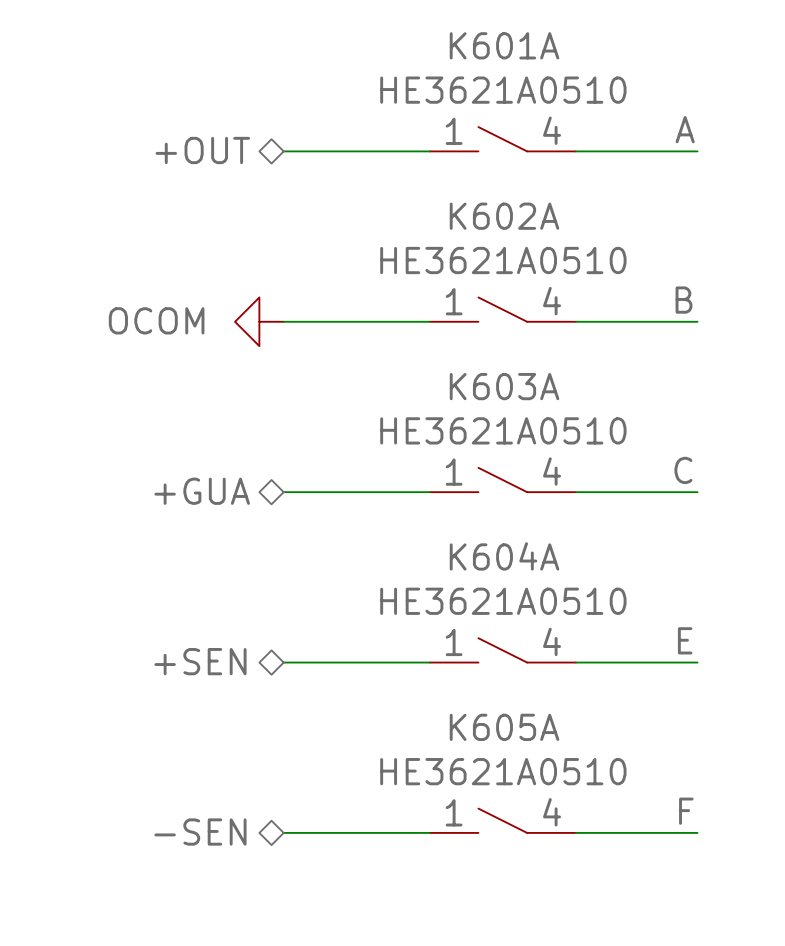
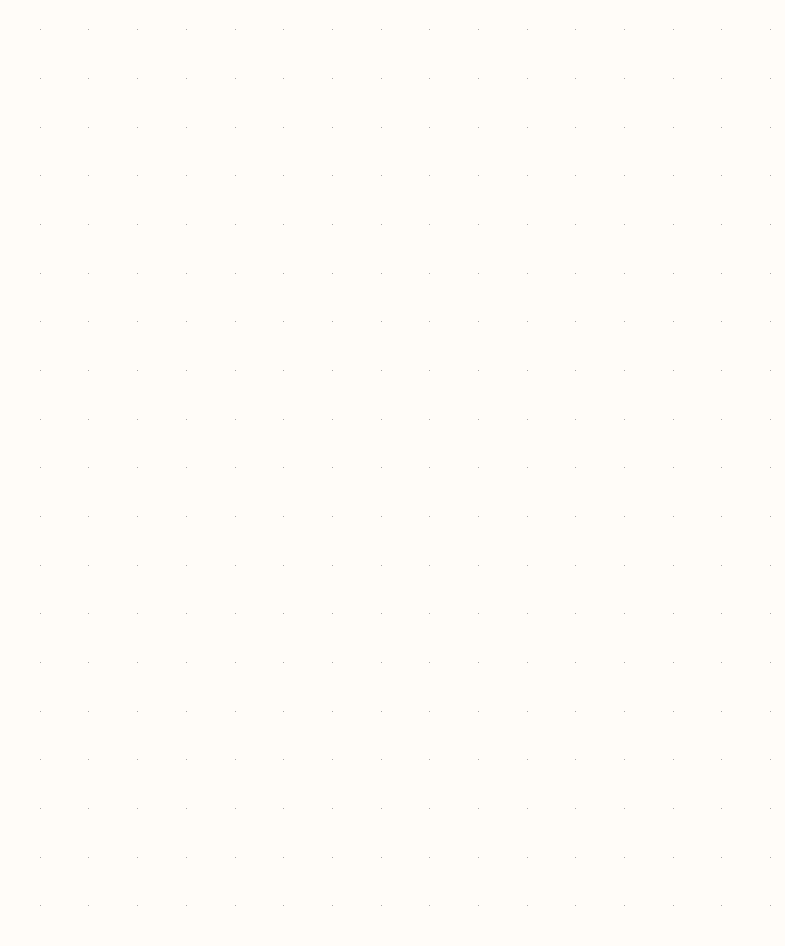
label: A (685, 129) -> none
K601A: HE3621A0510 (502, 139) -> none
hierarchical label: +OUT (202, 150) -> none
wire: (283, 151) (429, 151) -> none
wire: (575, 151) (697, 151) -> none
label: B (684, 300) -> none
K602A: HE3621A0510 (502, 309) -> none
power symbol: OCOM (259, 321) -> none
wire: (283, 321) (429, 321) -> none
wire: (575, 321) (697, 321) -> none
label: C (683, 470) -> none
K603A: HE3621A0510 (502, 479) -> none
hierarchical label: +GUA (202, 491) -> none
wire: (283, 492) (429, 492) -> none
wire: (575, 492) (697, 492) -> none
label: E (685, 640) -> none
K604A: HE3621A0510 (502, 650) -> none
hierarchical label: +SEN (200, 661) -> none
wire: (283, 662) (429, 662) -> none
wire: (575, 662) (697, 662) -> none
label: F (686, 811) -> none
K605A: HE3621A0510 (502, 820) -> none
hierarchical label: -SEN (200, 832) -> none
wire: (283, 832) (429, 832) -> none
wire: (575, 832) (697, 832) -> none

